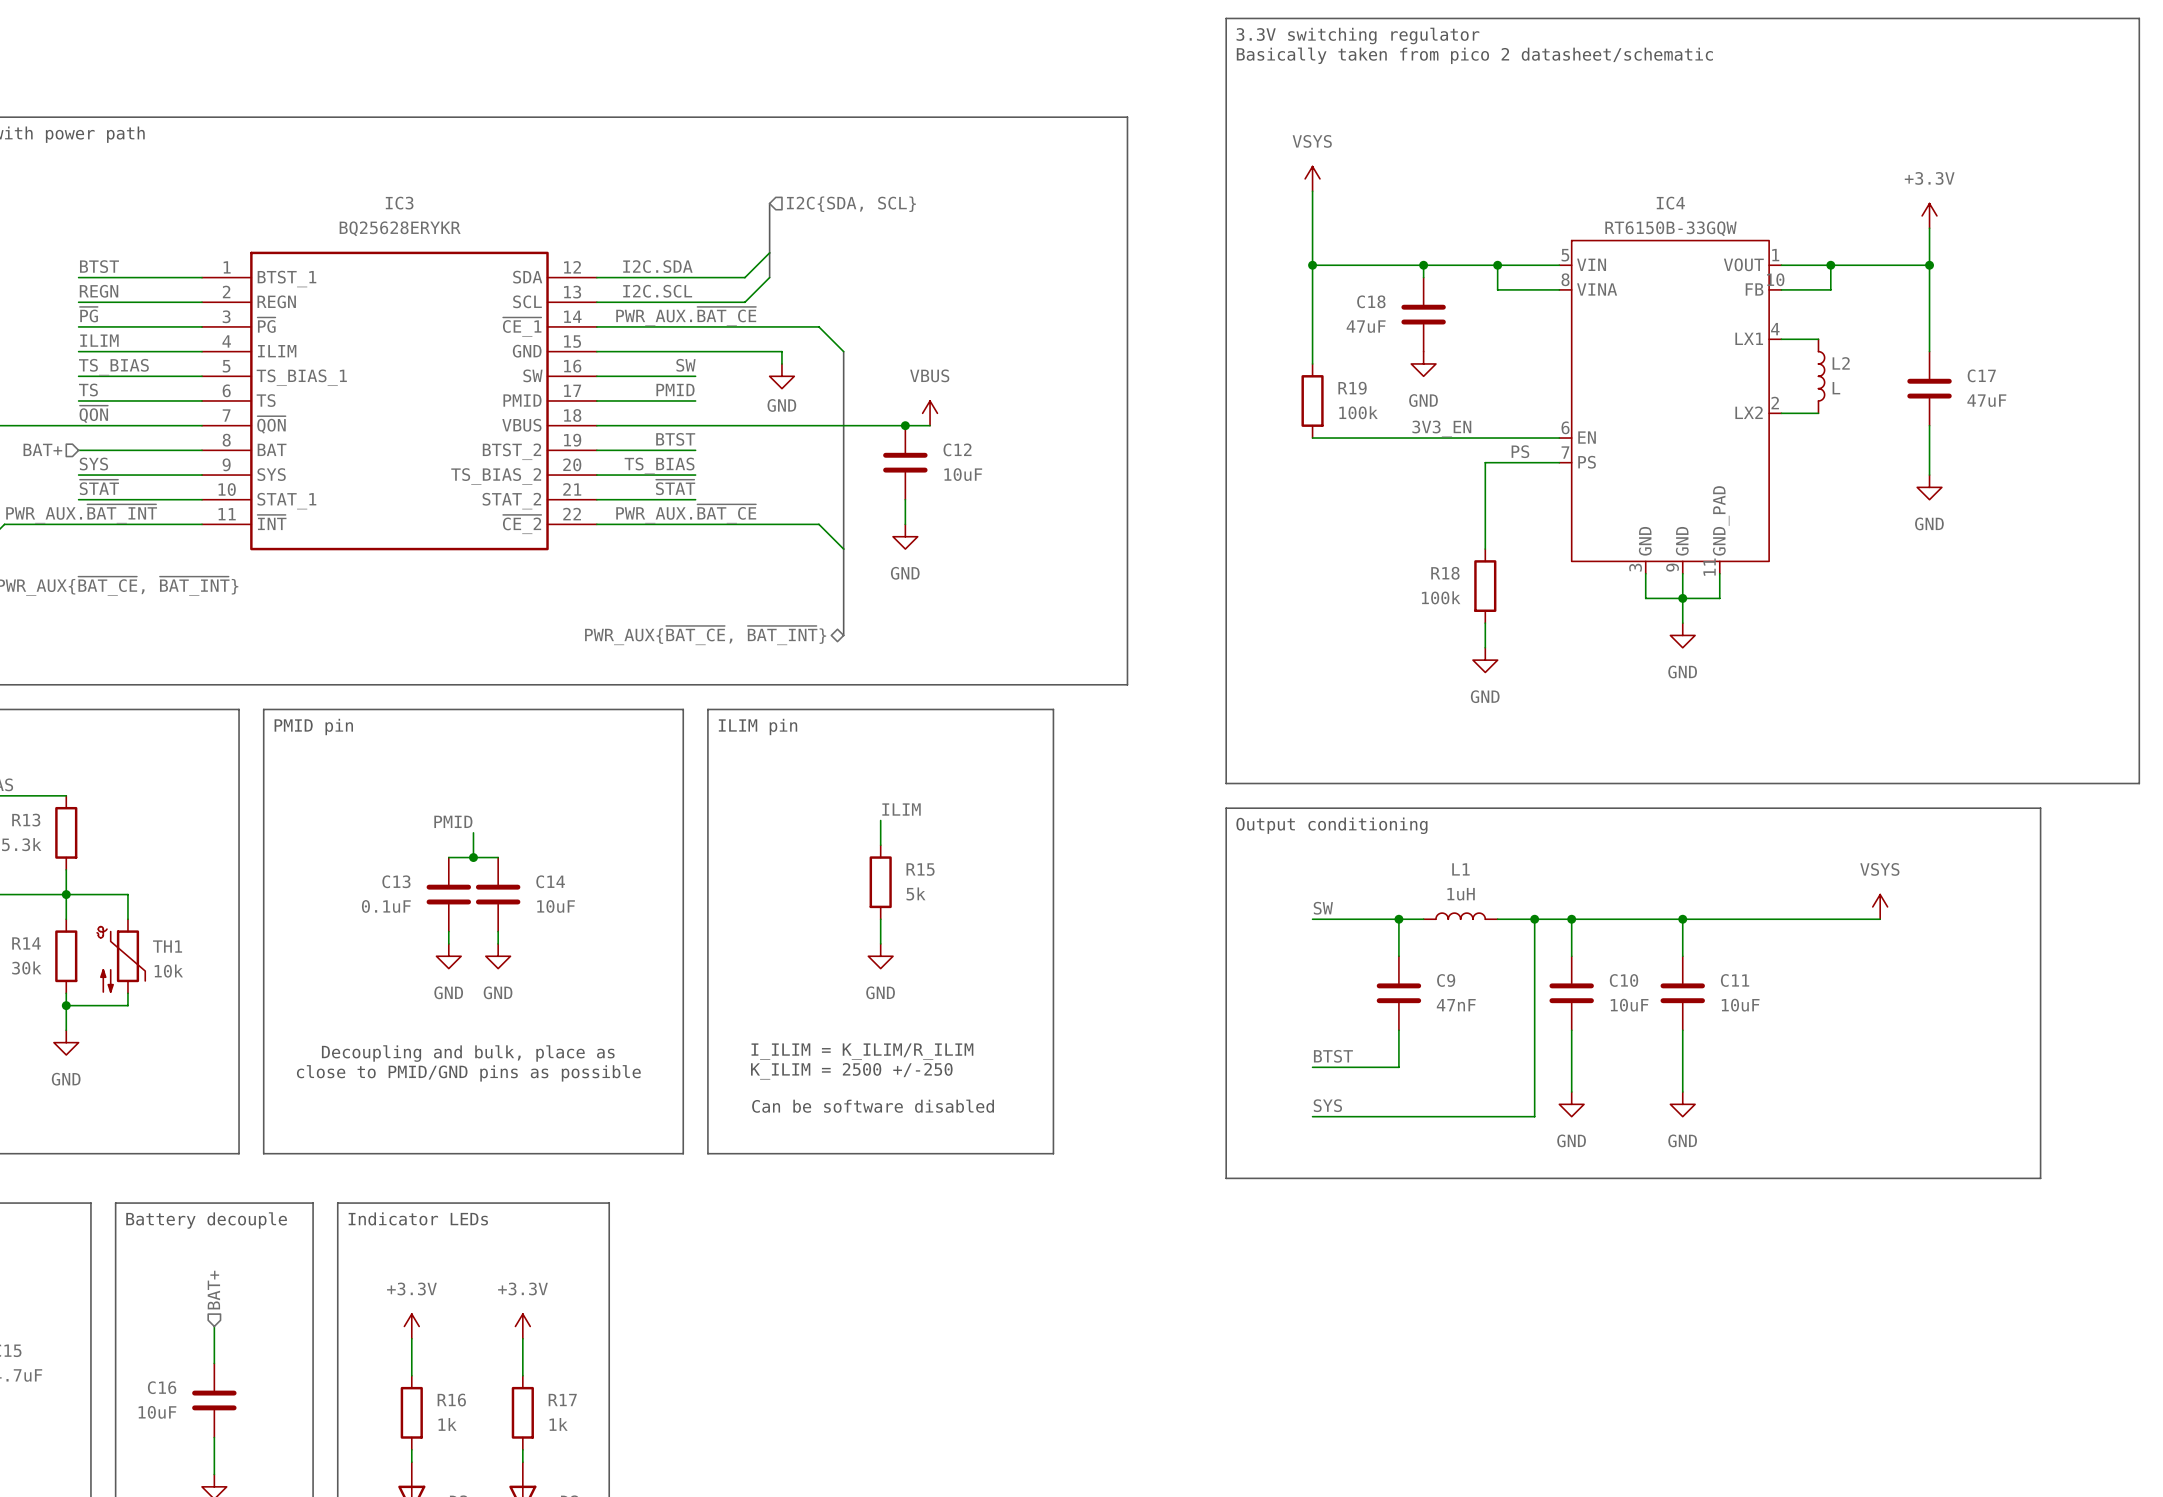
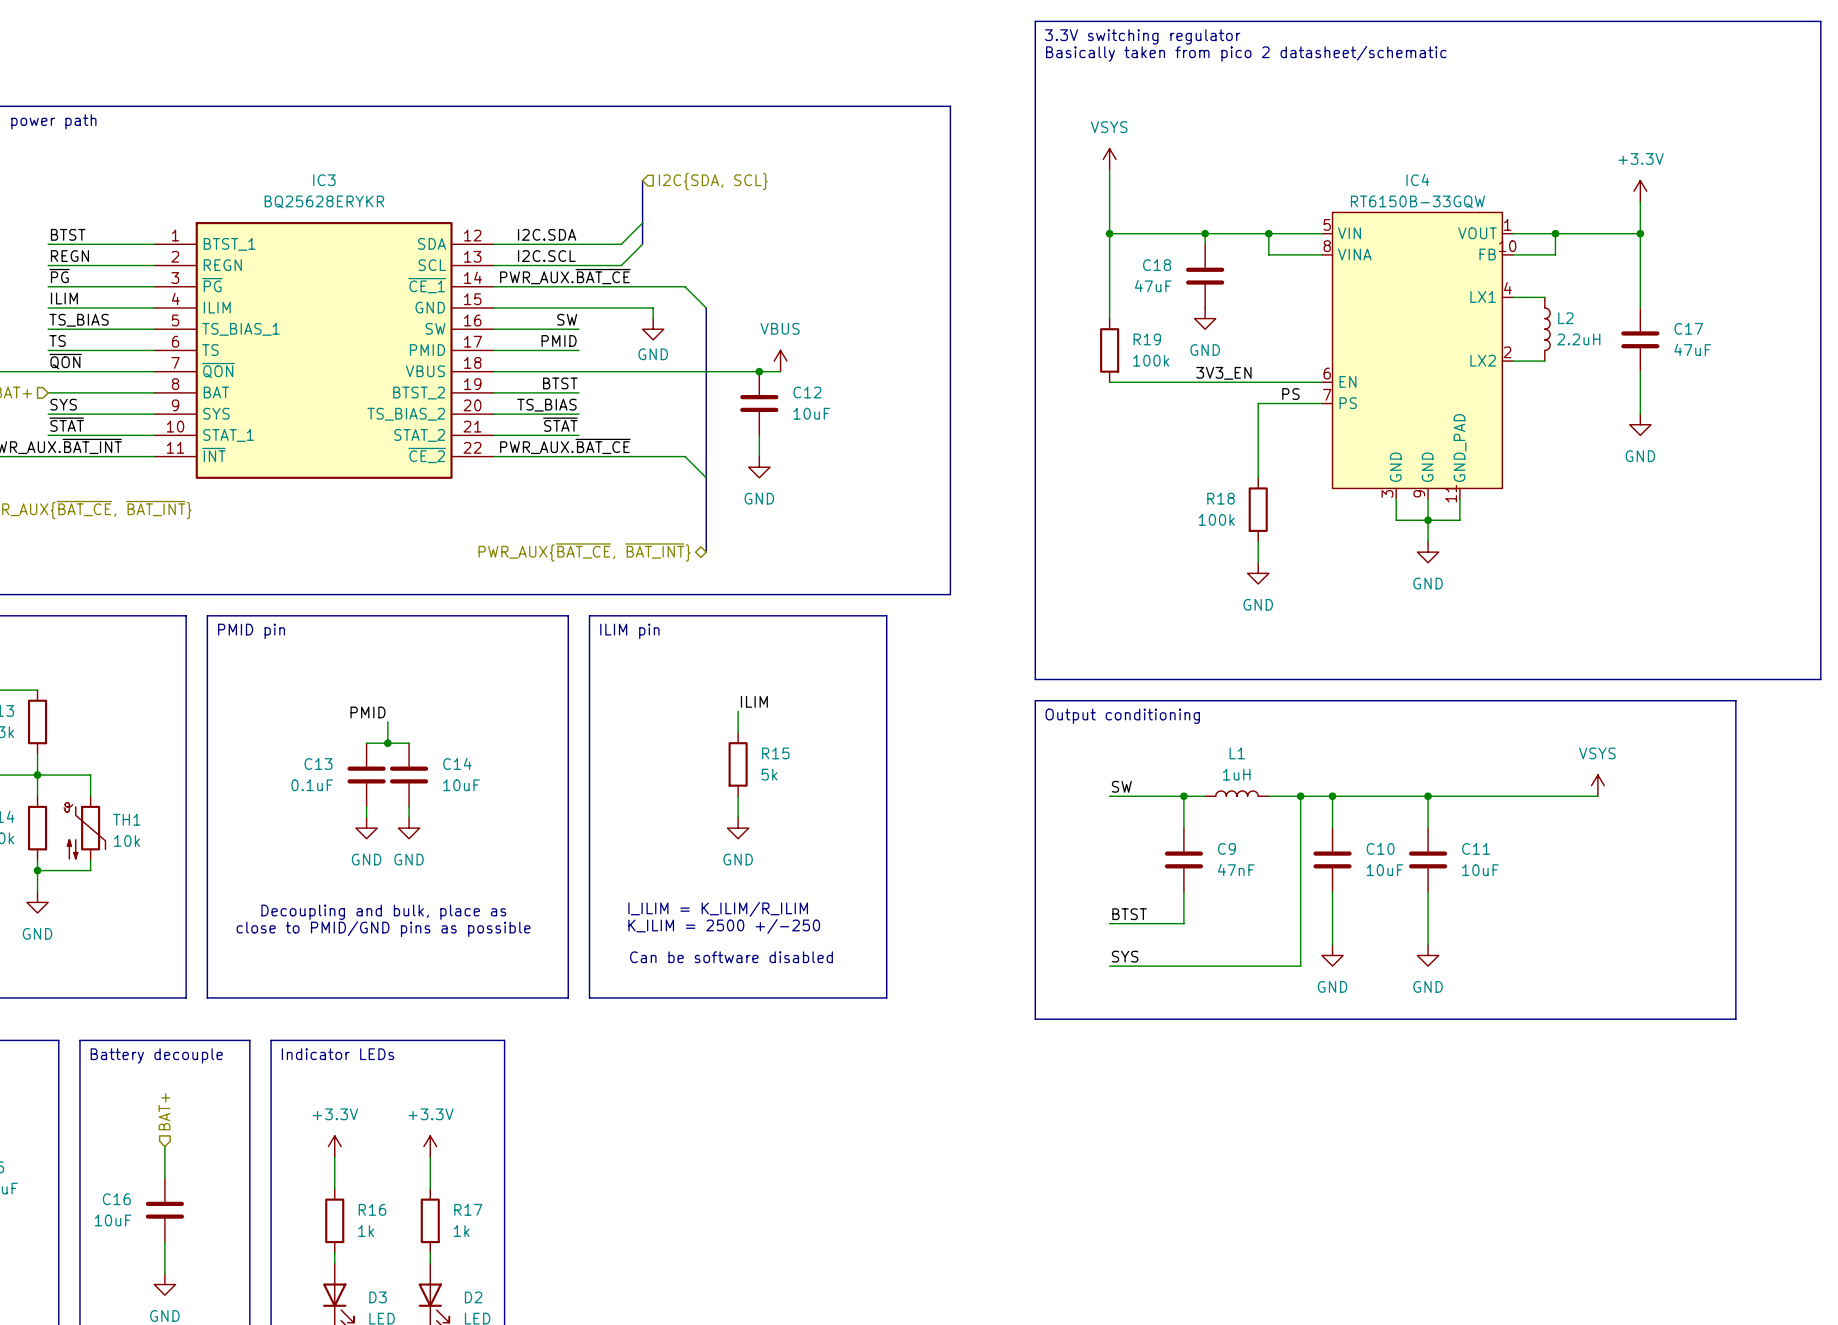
L2 value: L (1836, 388) -> 2.2uH (1578, 339)

